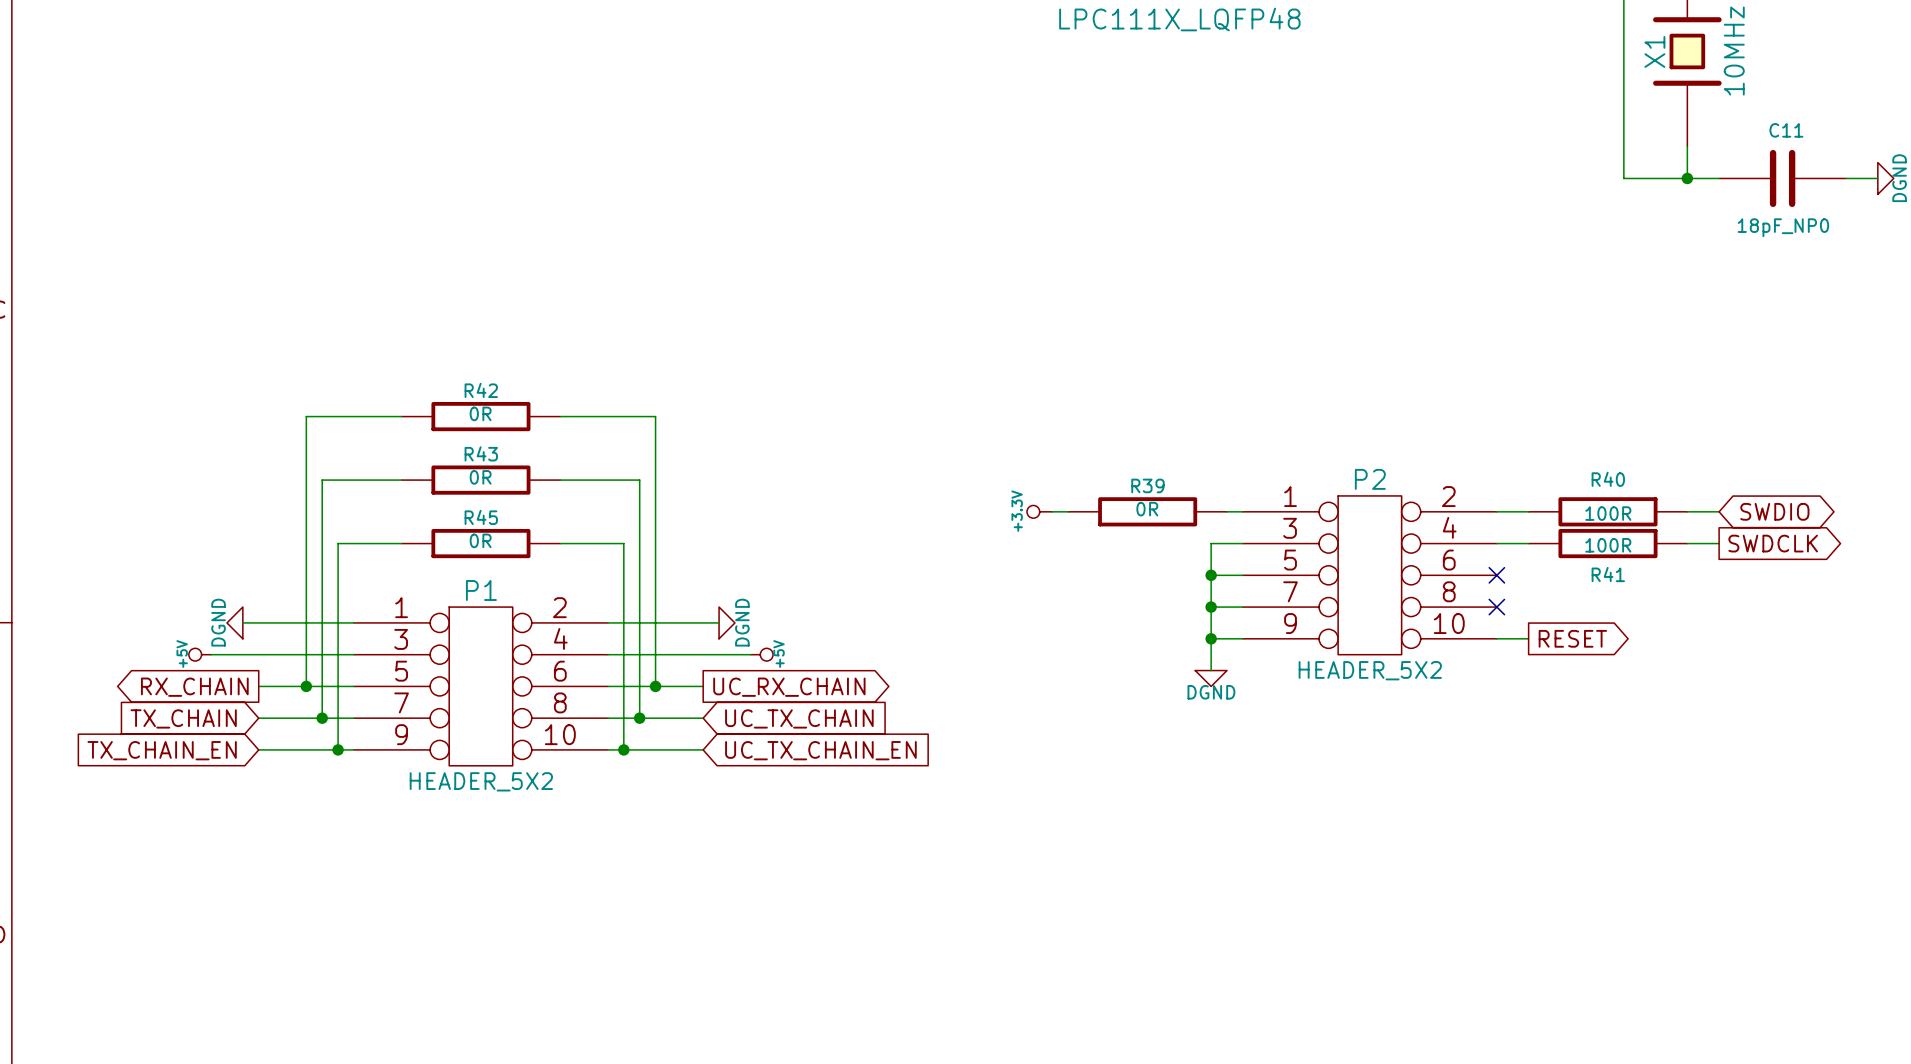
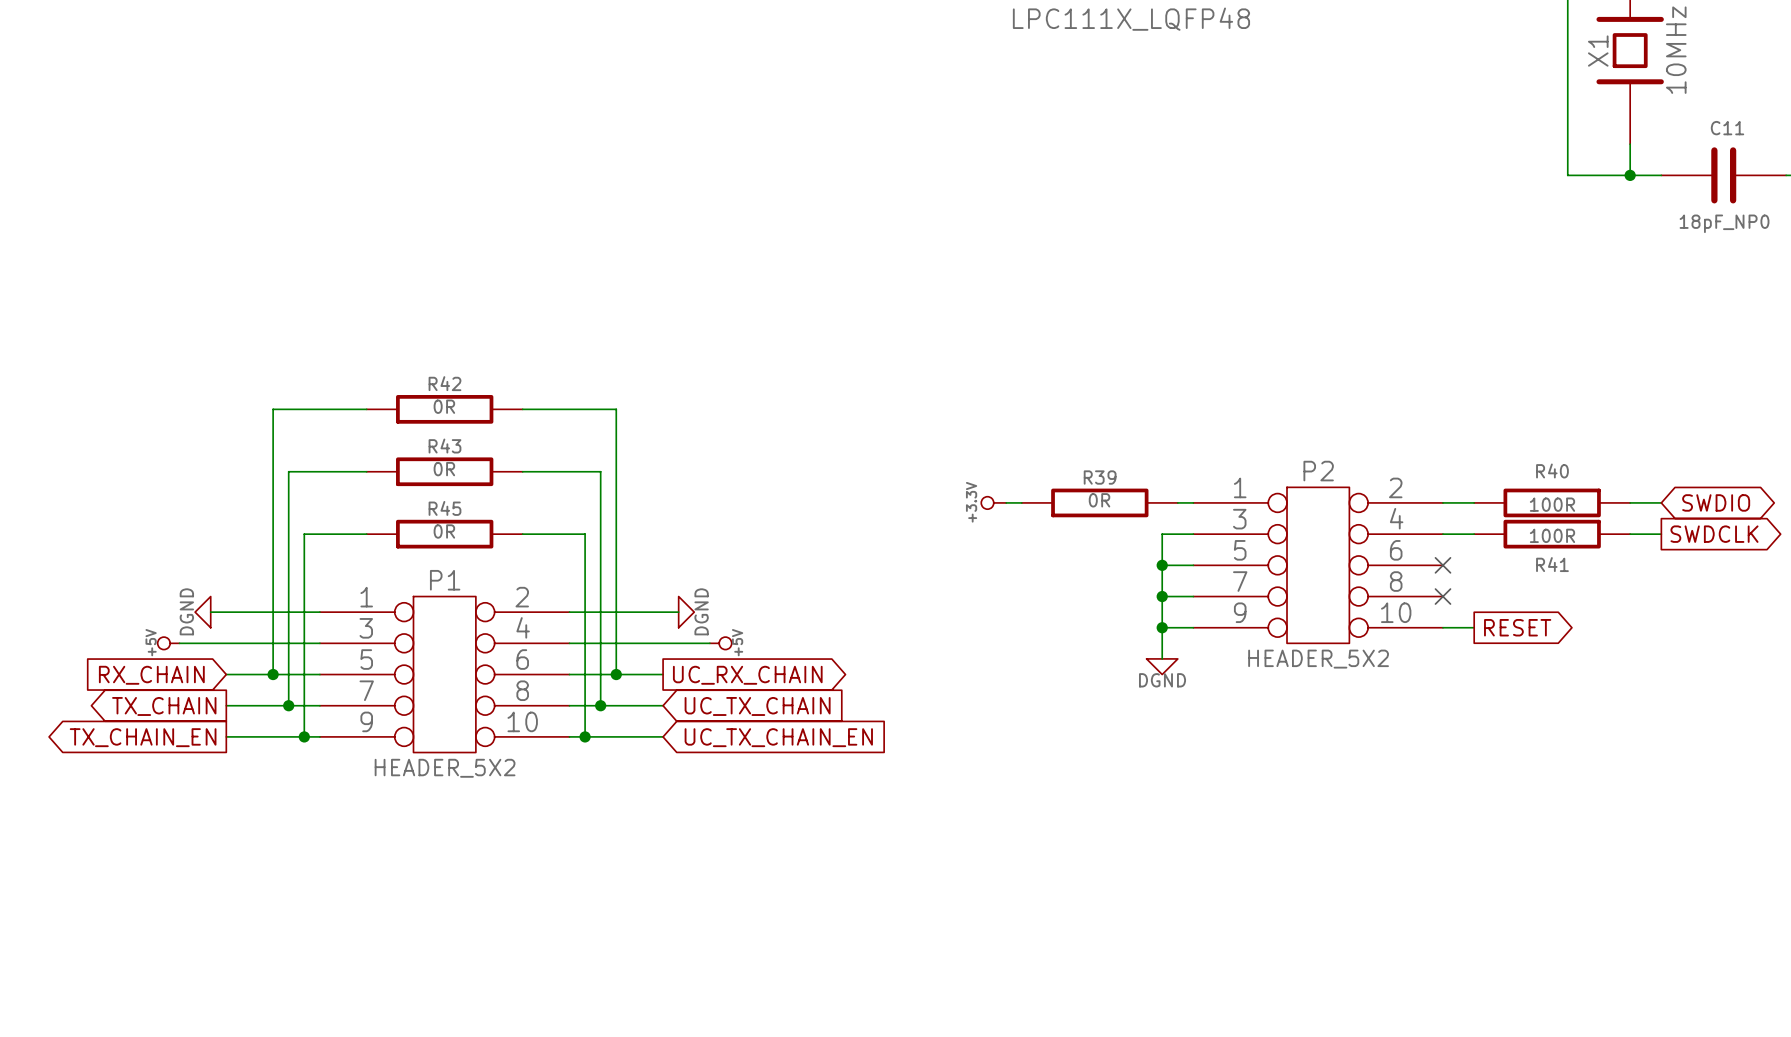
global label shape: output (194, 687) -> input (151, 675)
global label shape: input (183, 718) -> output (164, 706)
global label shape: input (162, 750) -> output (143, 737)

